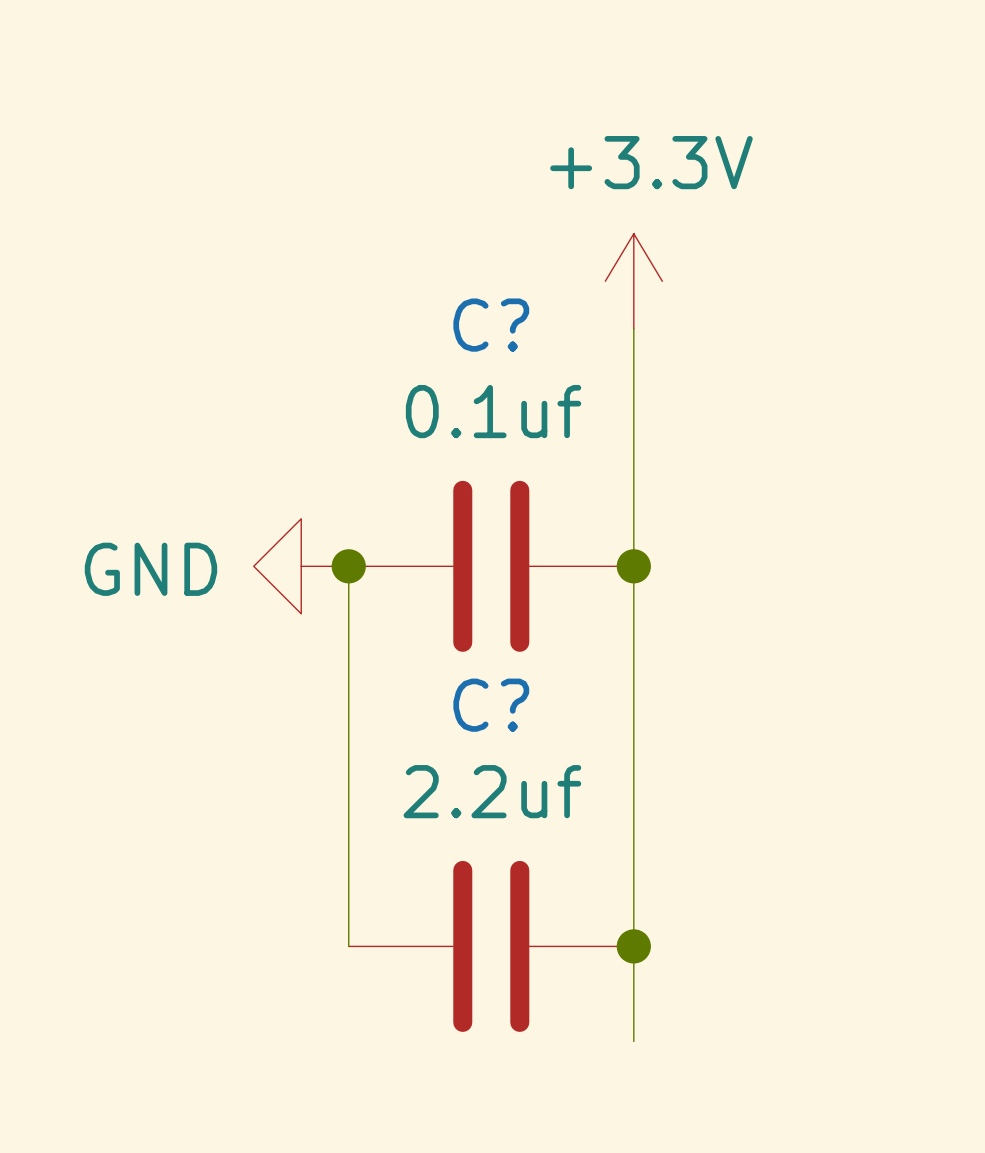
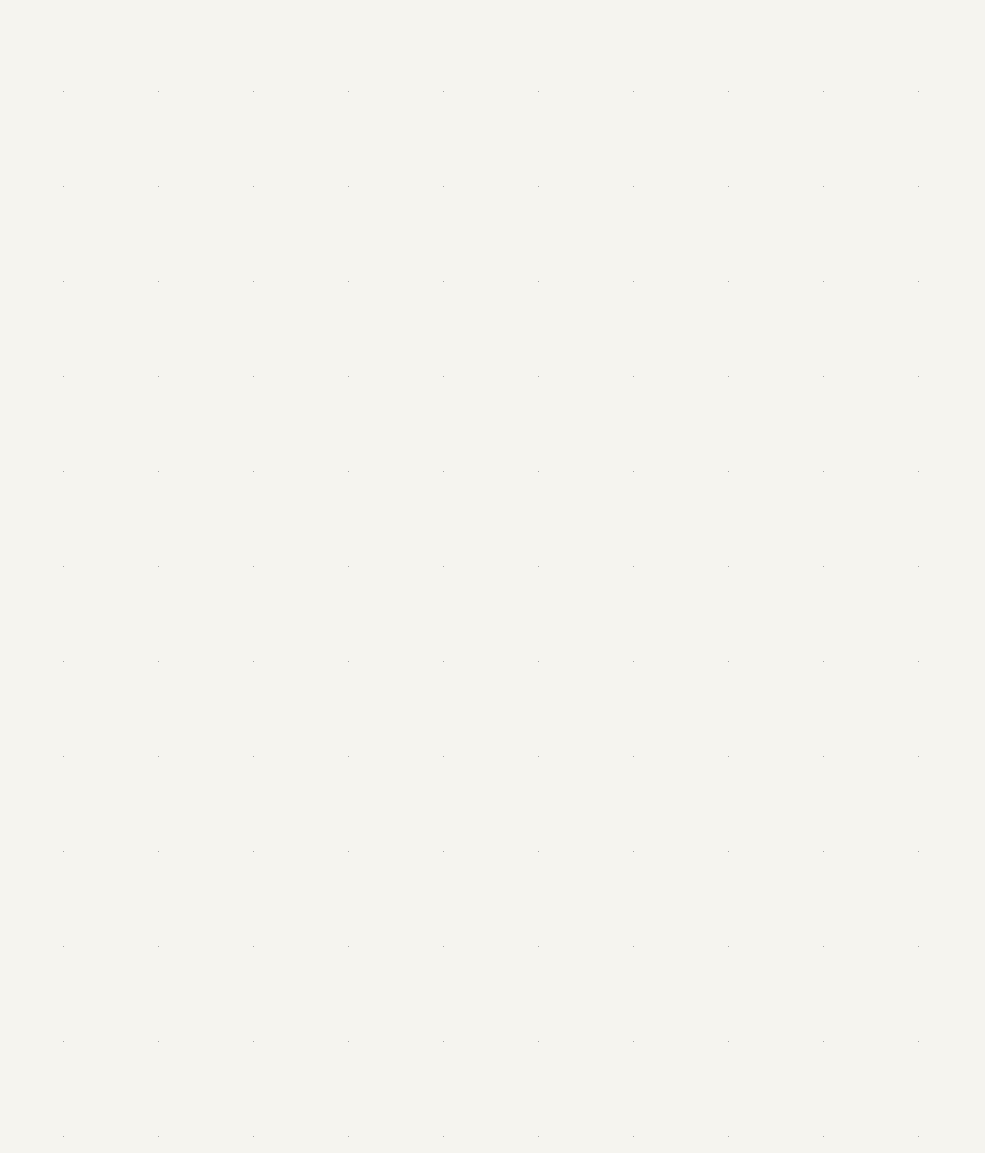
power symbol: +3.3V (633, 281) -> none
wire: (633, 328) (633, 1041) -> none
power symbol: GND (301, 566) -> none
wire: (348, 566) (348, 946) -> none
junction: (348, 566) -> none
C?: 0.1uf (491, 566) -> none
junction: (633, 566) -> none
C?: 2.2uf (491, 946) -> none
junction: (633, 946) -> none

